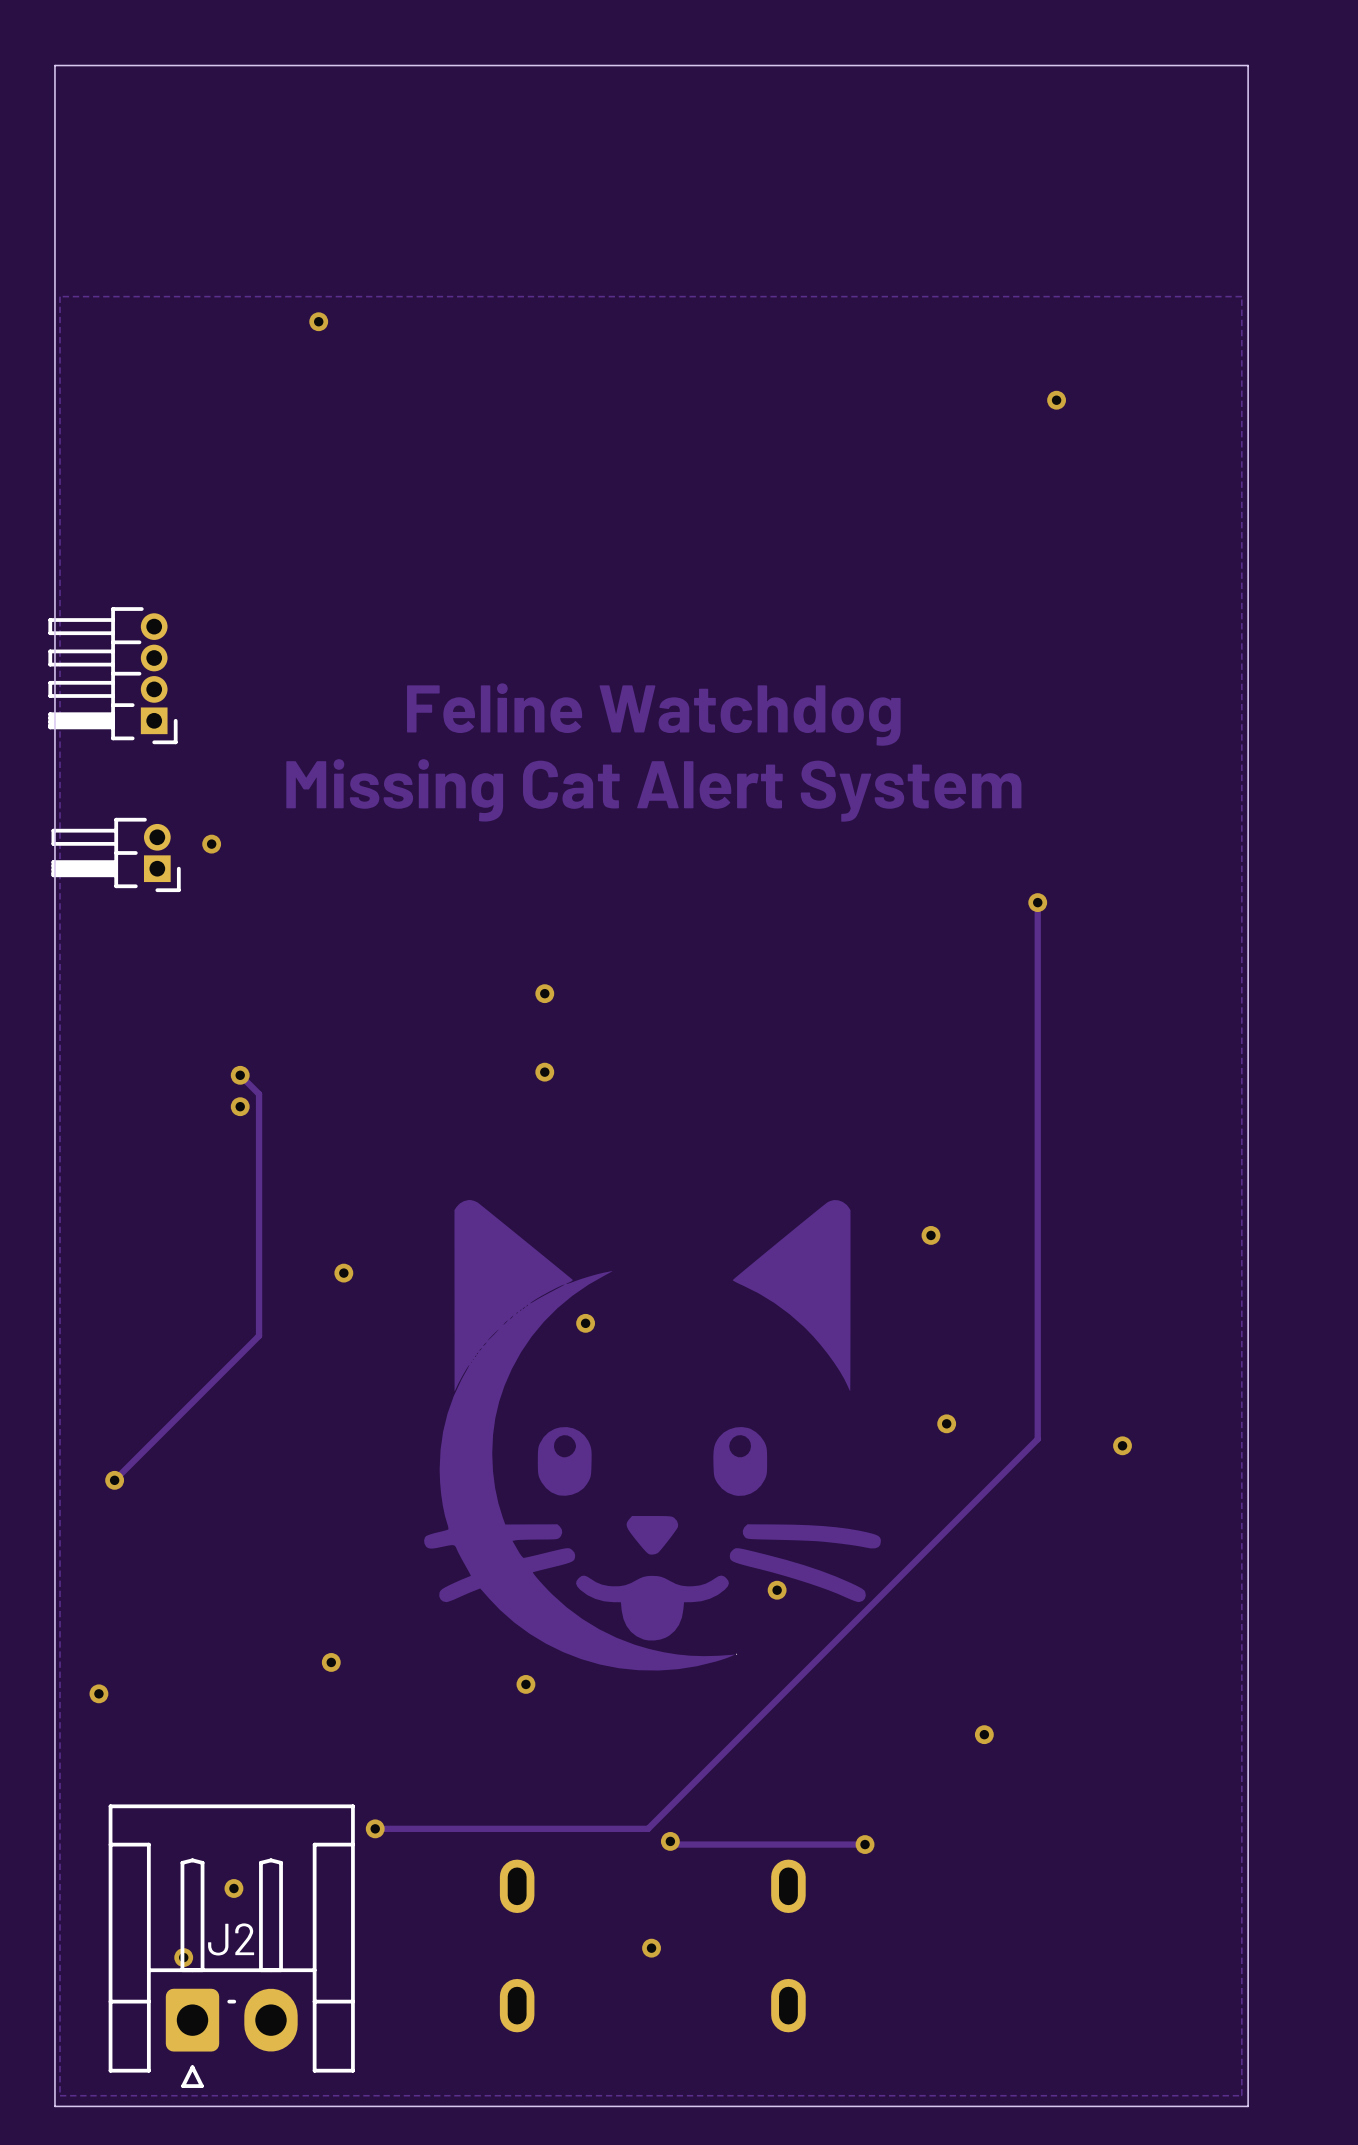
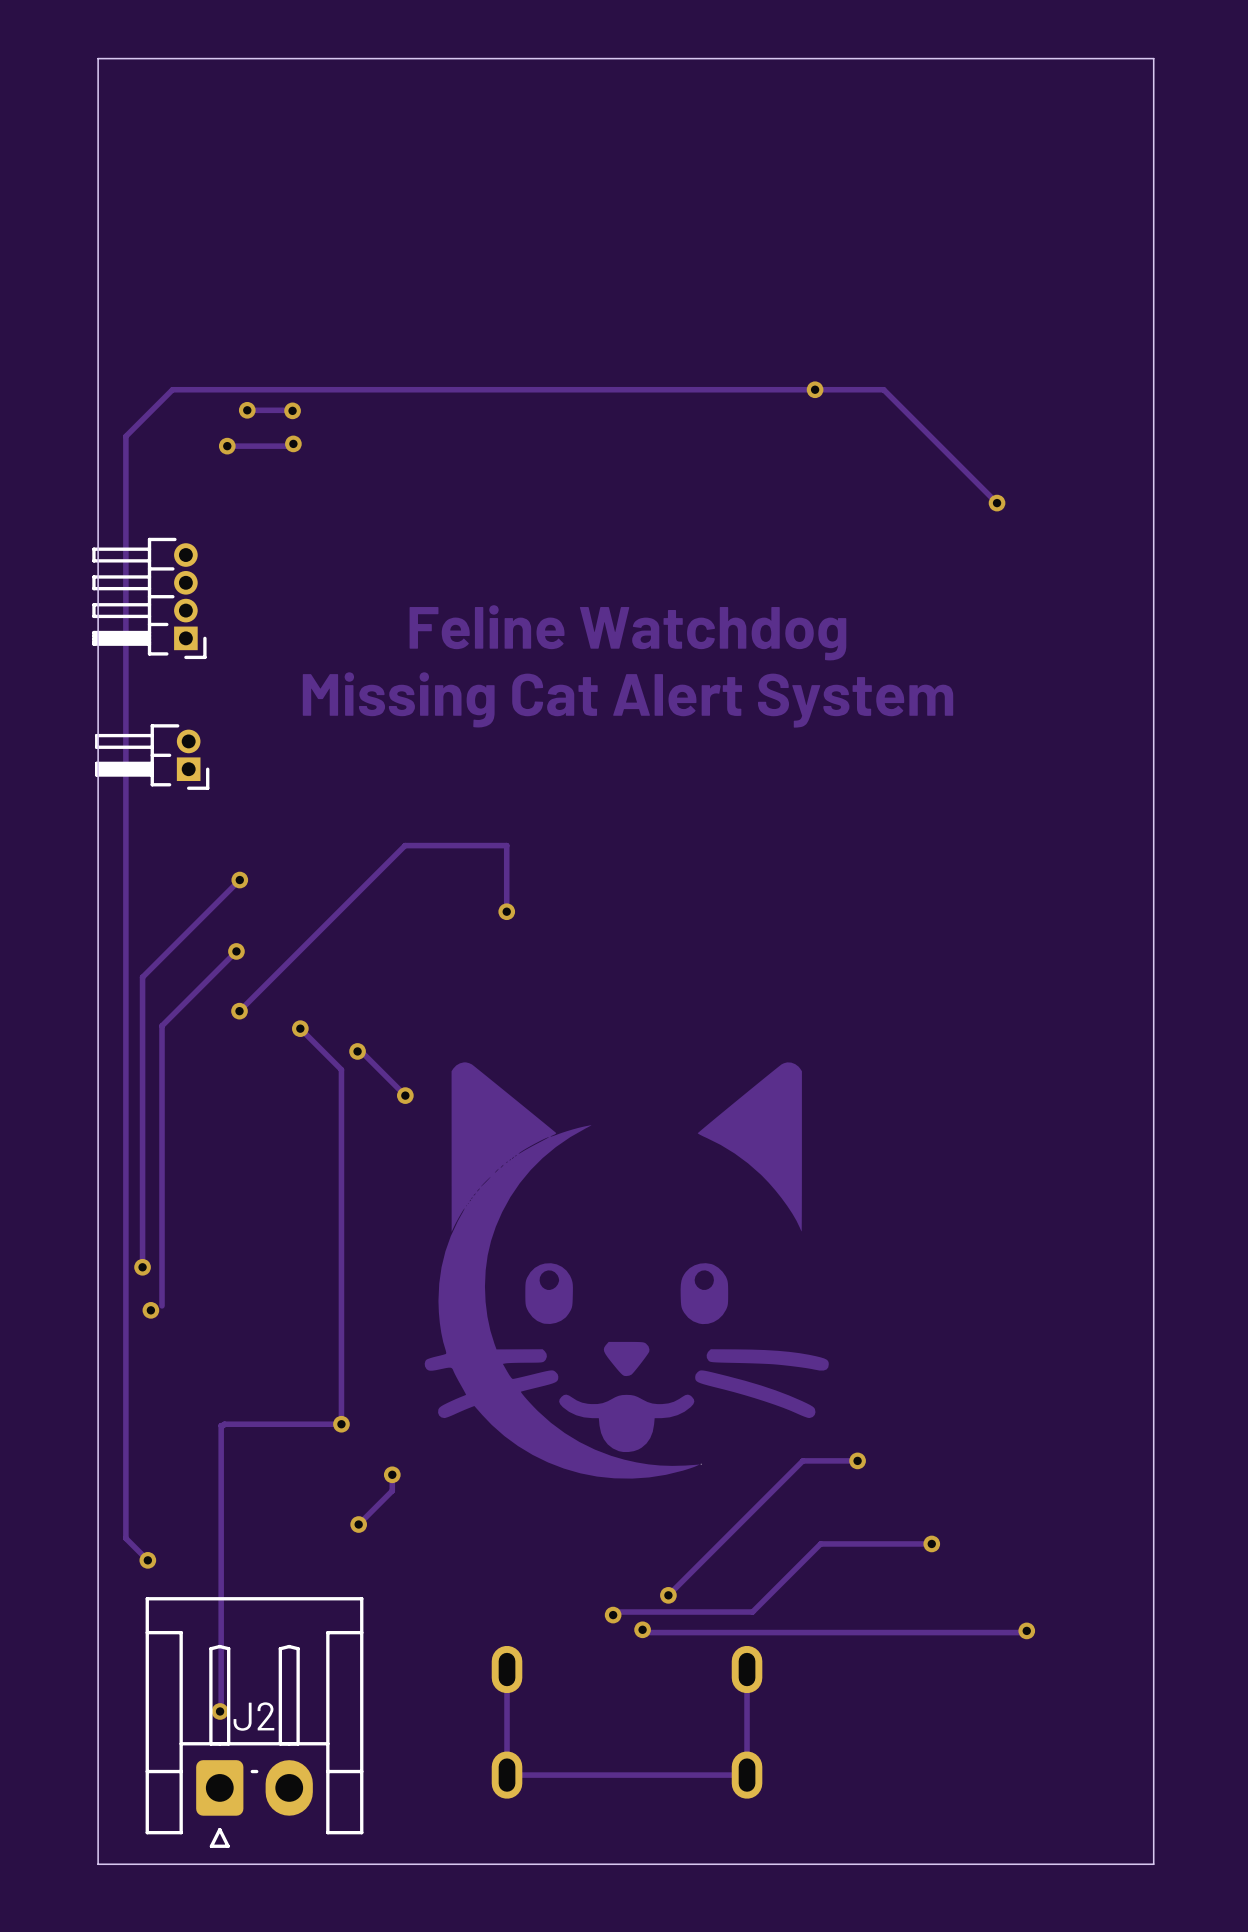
via: (318, 321) -> none
via: (1056, 400) -> none
via: none -> (815, 389)
track: none -> (247, 410) (292, 410)
via: none -> (247, 410)
via: none -> (292, 410)
track: none -> (293, 443) (291, 446) (227, 446)
via: none -> (293, 443)
via: none -> (227, 446)
track: none -> (997, 503) (883, 389) (172, 389) (125, 436) (125, 1538) (147, 1560)
via: none -> (997, 503)
via: (211, 844) -> none
track: (1037, 902) (1037, 1439) (648, 1828) (375, 1828) -> none
via: (1037, 902) -> none
track: none -> (239, 880) (142, 977) (142, 1267)
via: none -> (239, 880)
via: (544, 993) -> none
track: none -> (506, 911) (506, 845) (405, 845) (239, 1011)
via: none -> (506, 911)
via: (544, 1072) -> none
track: none -> (236, 951) (162, 1025) (162, 1305)
via: none -> (236, 951)
track: (240, 1075) (259, 1094) (259, 1335) (114, 1480) -> none
via: (240, 1075) -> none
via: (240, 1106) -> none
via: none -> (239, 1011)
track: none -> (300, 1028) (341, 1069) (341, 1424) (221, 1425) (220, 1711)
via: none -> (300, 1028)
track: none -> (357, 1051) (361, 1051) (405, 1095)
via: none -> (357, 1051)
via: (930, 1235) -> none
via: none -> (405, 1095)
via: (343, 1273) -> none
via: (585, 1323) -> none
via: (946, 1423) -> none
via: none -> (142, 1267)
via: (1122, 1445) -> none
via: (777, 1590) -> none
via: none -> (341, 1424)
track: none -> (857, 1460) (802, 1460) (668, 1595)
via: none -> (857, 1460)
via: (331, 1662) -> none
track: none -> (392, 1474) (392, 1490) (358, 1524)
via: none -> (392, 1474)
via: (525, 1684) -> none
via position: (98, 1693) -> (147, 1560)
via: none -> (358, 1524)
via position: (984, 1734) -> (931, 1543)
track: none -> (931, 1543) (820, 1543) (752, 1612) (616, 1612) (613, 1615)
via: none -> (668, 1595)
via: none -> (613, 1615)
via: (375, 1828) -> none
track: none -> (1026, 1630) (1025, 1632) (814, 1632)
via: none -> (1026, 1630)
via: (865, 1844) -> none
track: none -> (747, 1669) (747, 1775) (507, 1775) (507, 1669)
via: (233, 1888) -> none
via: (651, 1948) -> none
via position: (183, 1957) -> (220, 1711)
zone outline: (1241, 2095) (1241, 296) (59, 296) (59, 2095) (1241, 2095) -> none

